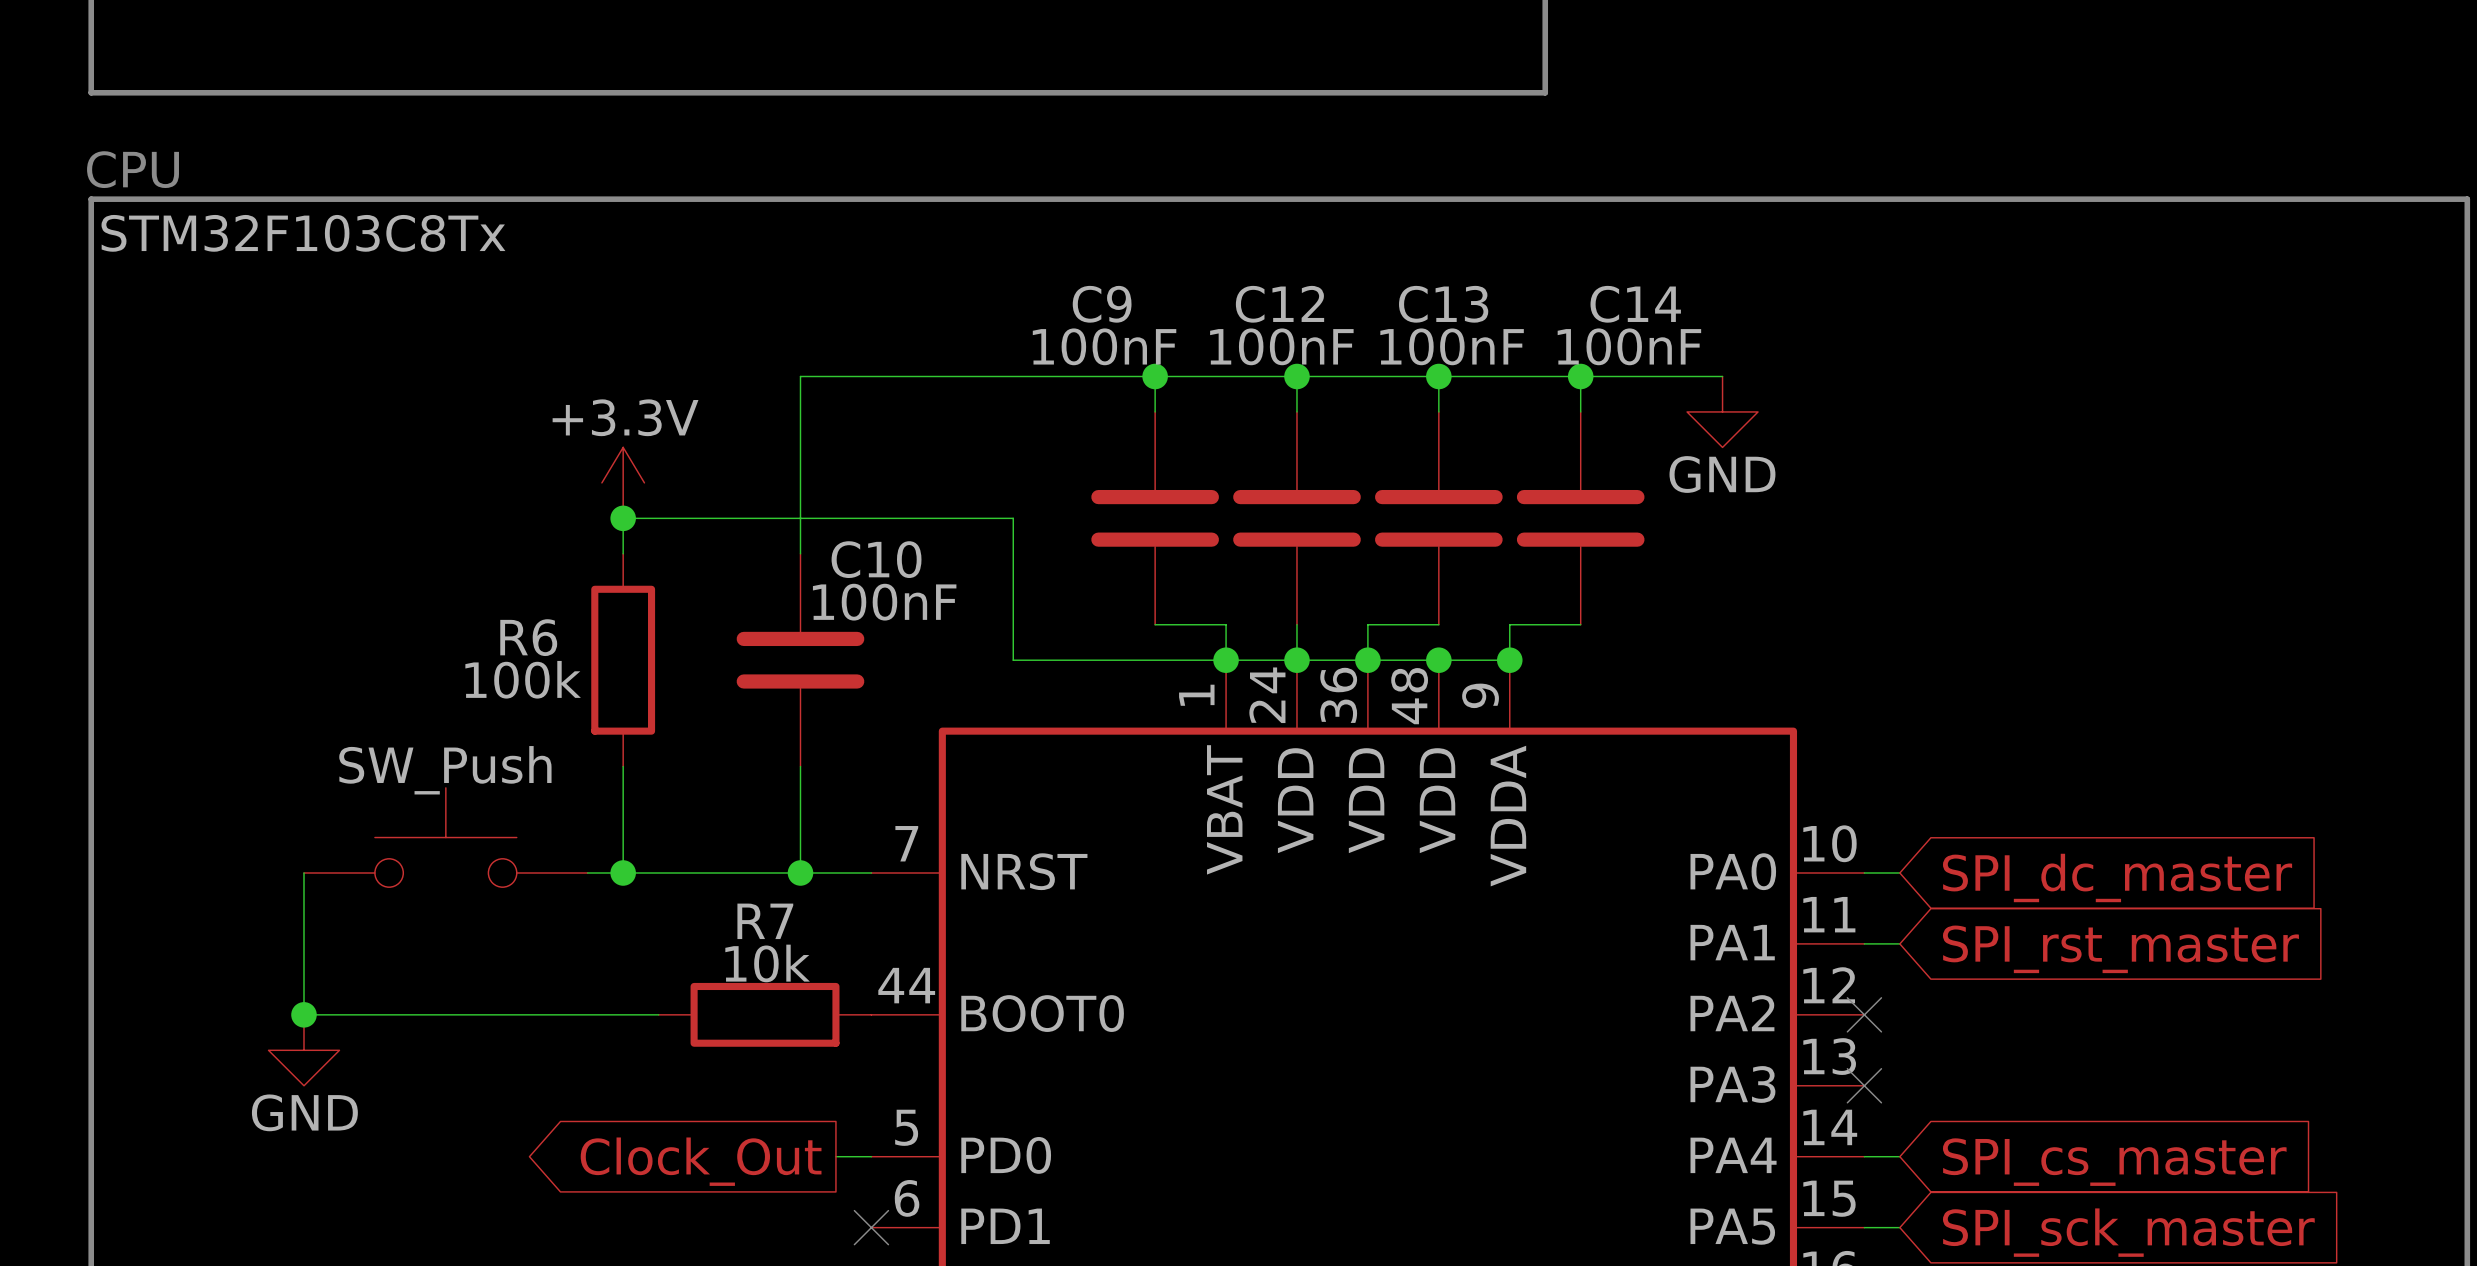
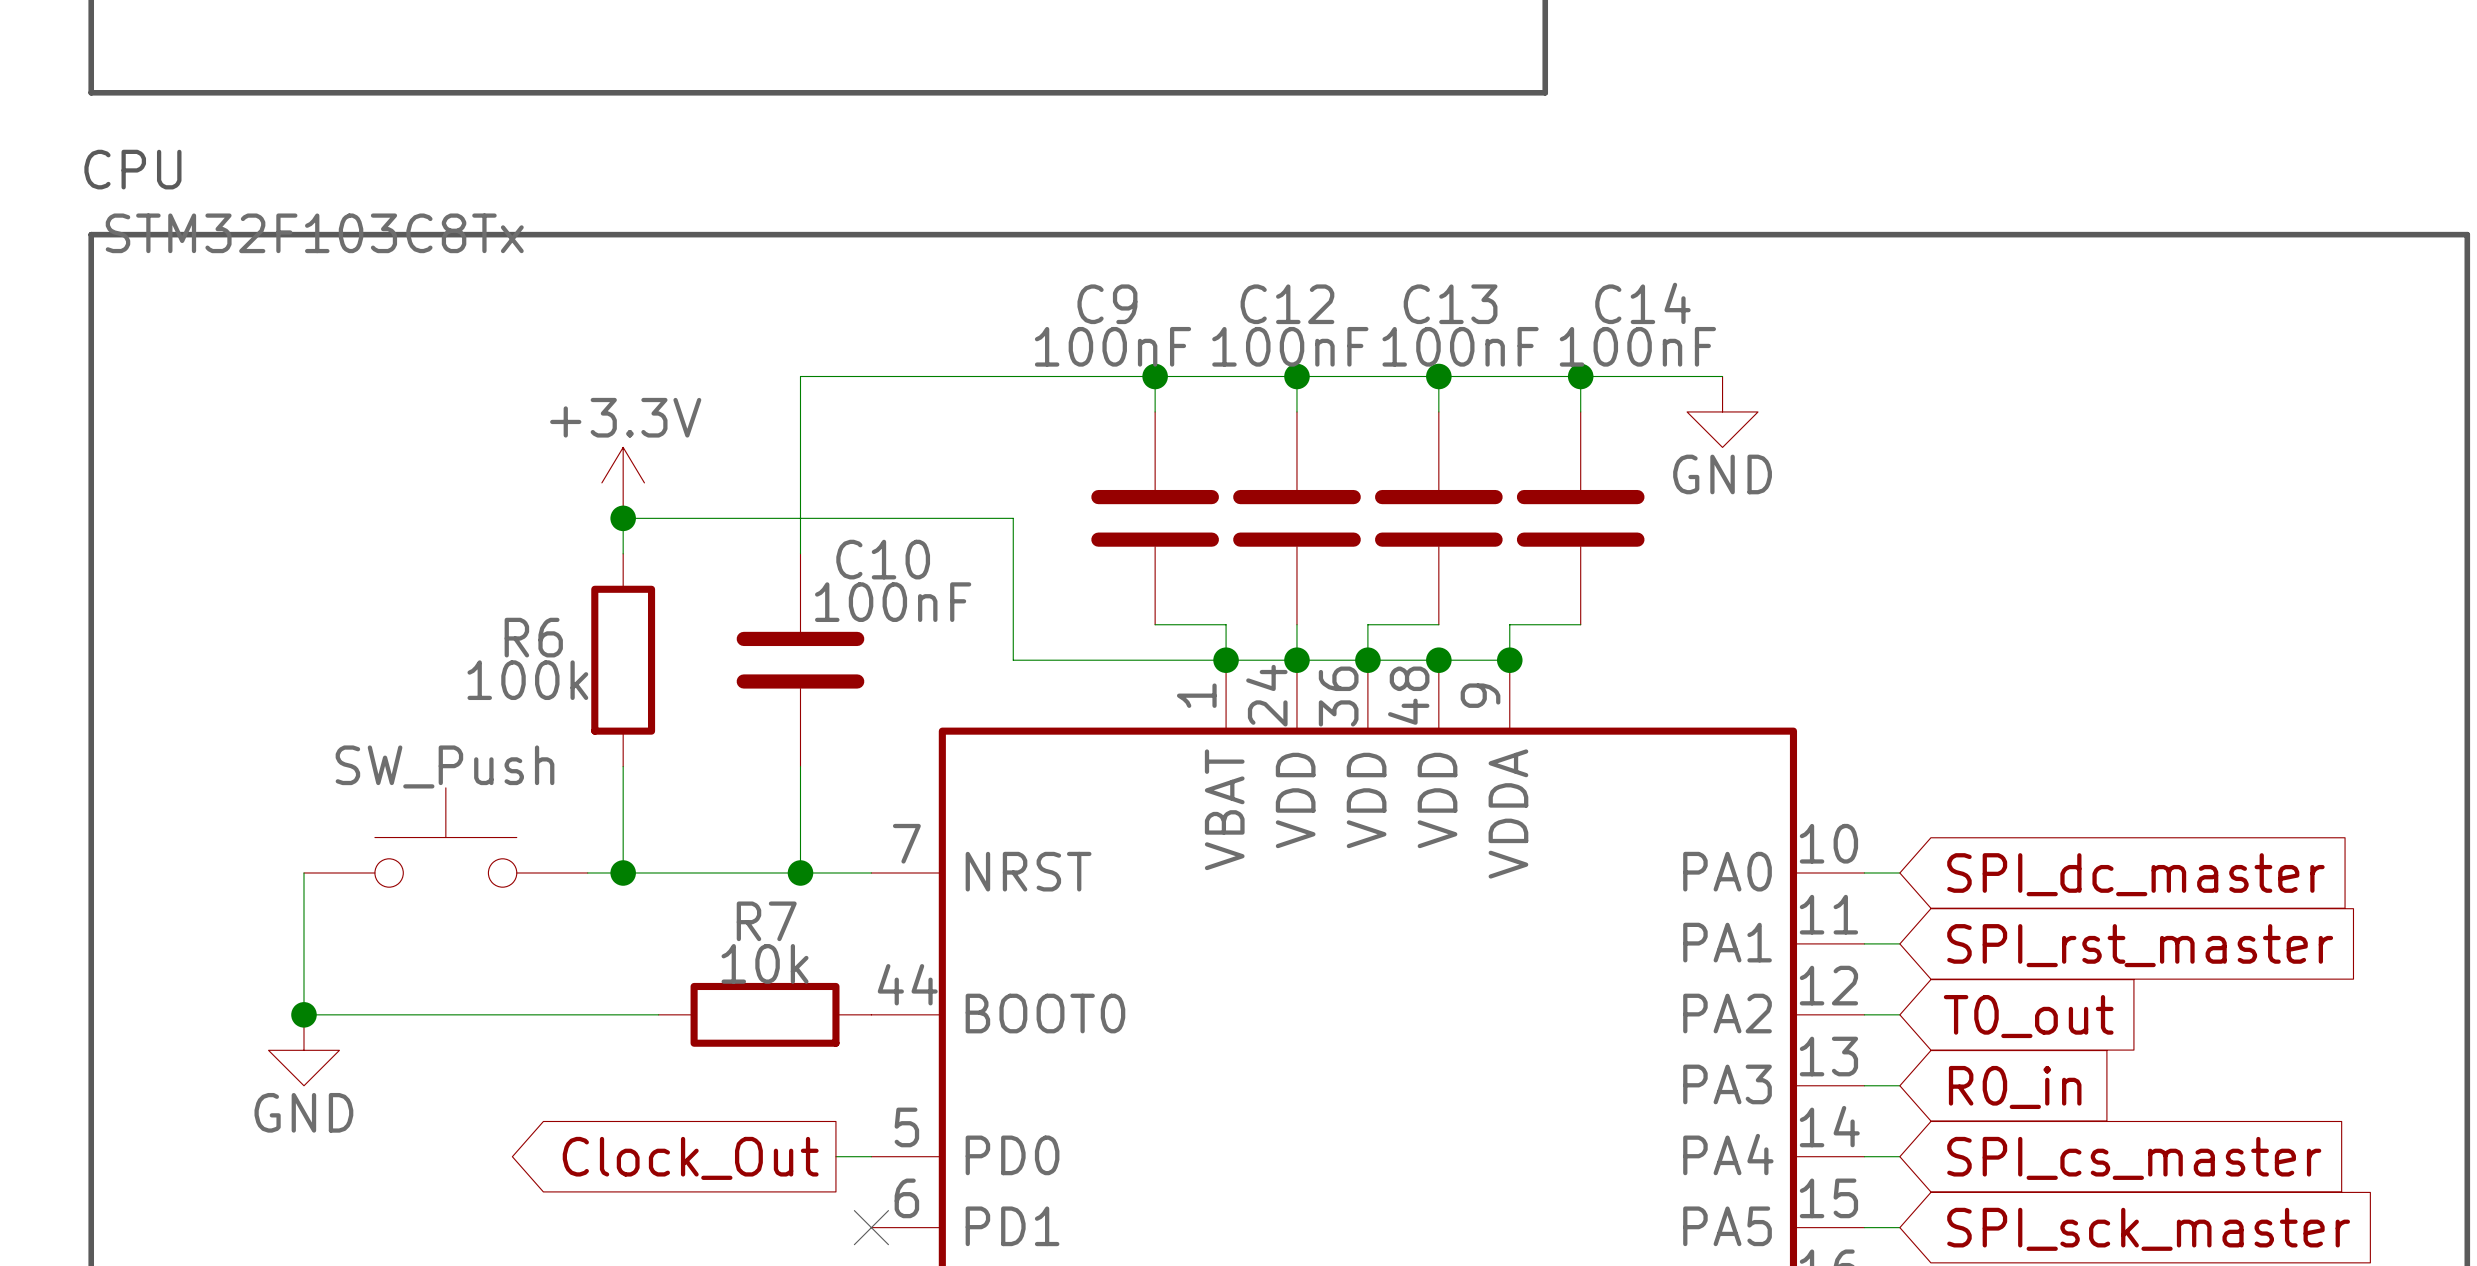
line: (91, 234) (91, 199) (2467, 199) (2467, 234) -> (91, 234) (2467, 234)
wire: none -> (1864, 1014) (1899, 1014)
no-connect mark: (1864, 1014) -> none
global label: none -> T0_out (2028, 1016)
wire: none -> (1864, 1085) (1899, 1085)
no-connect mark: (1864, 1085) -> none
global label: none -> R0_in (2015, 1087)

